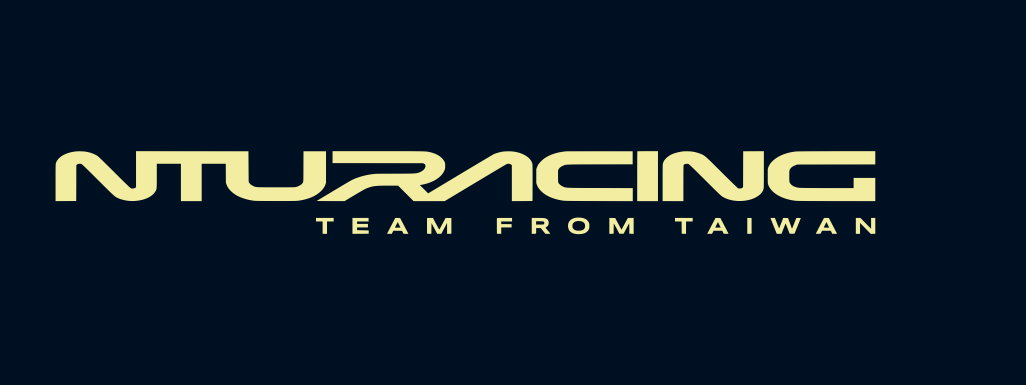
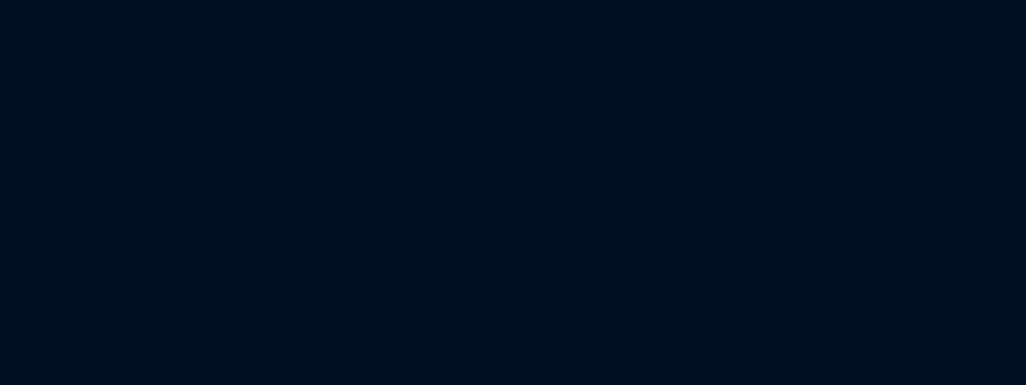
drawing: [55, 151, 876, 235] -> none

